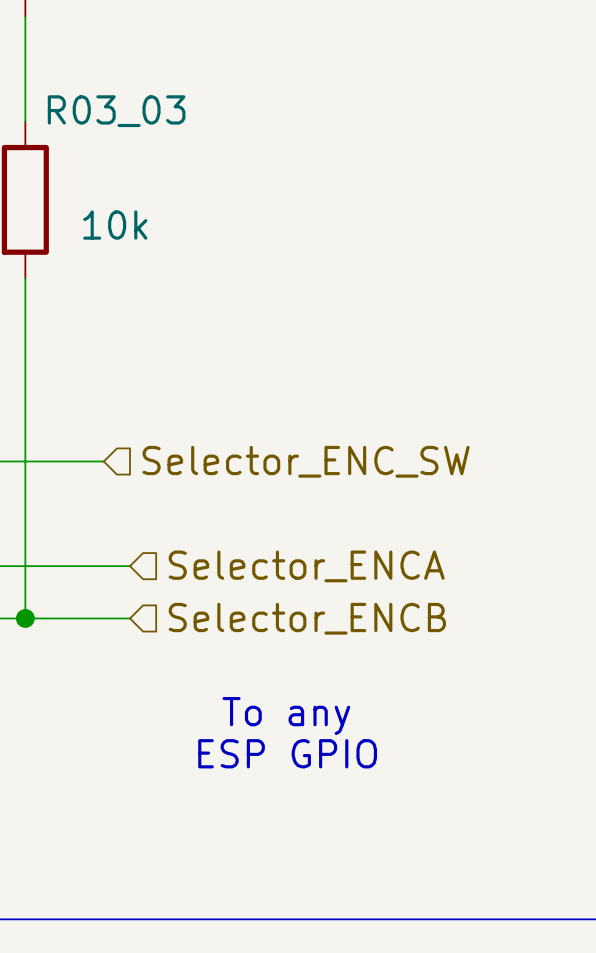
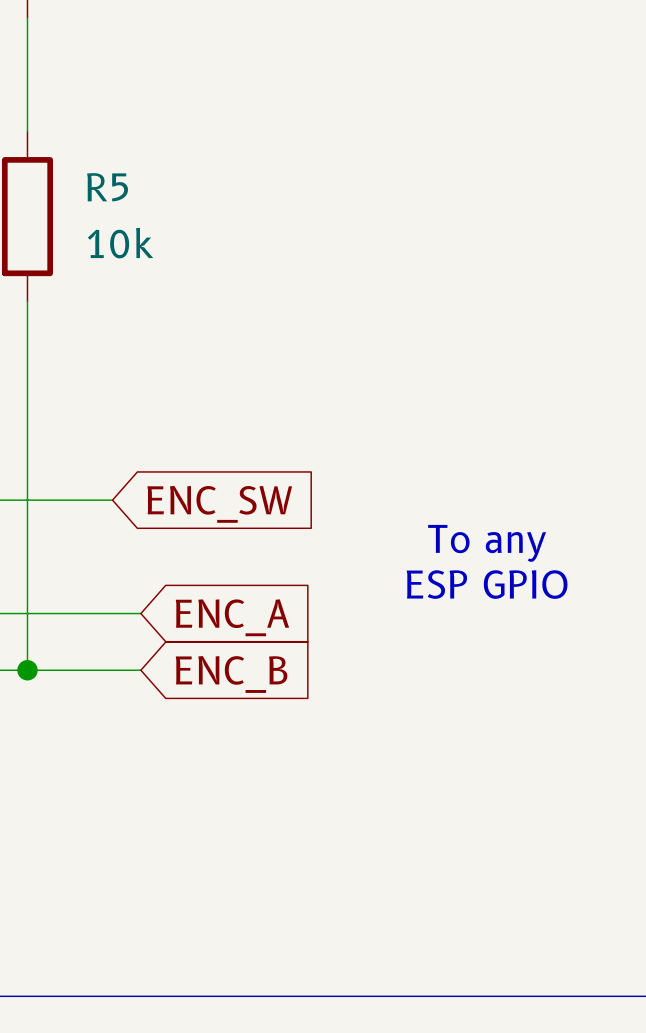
R03_03 name: R03_03 (116, 111) -> R5 (107, 187)
hierarchical label: Selector_ENC_SW (306, 461) -> none
global label: none -> ENC_SW (219, 504)
hierarchical label: Selector_ENCA (306, 566) -> none
global label: none -> ENC_A (232, 617)
hierarchical label: Selector_ENCB (307, 618) -> none
global label: none -> ENC_B (231, 674)
text position: To any (286, 715) -> To any (487, 543)
text position: ESP GPIO (287, 753) -> ESP GPIO (487, 584)

